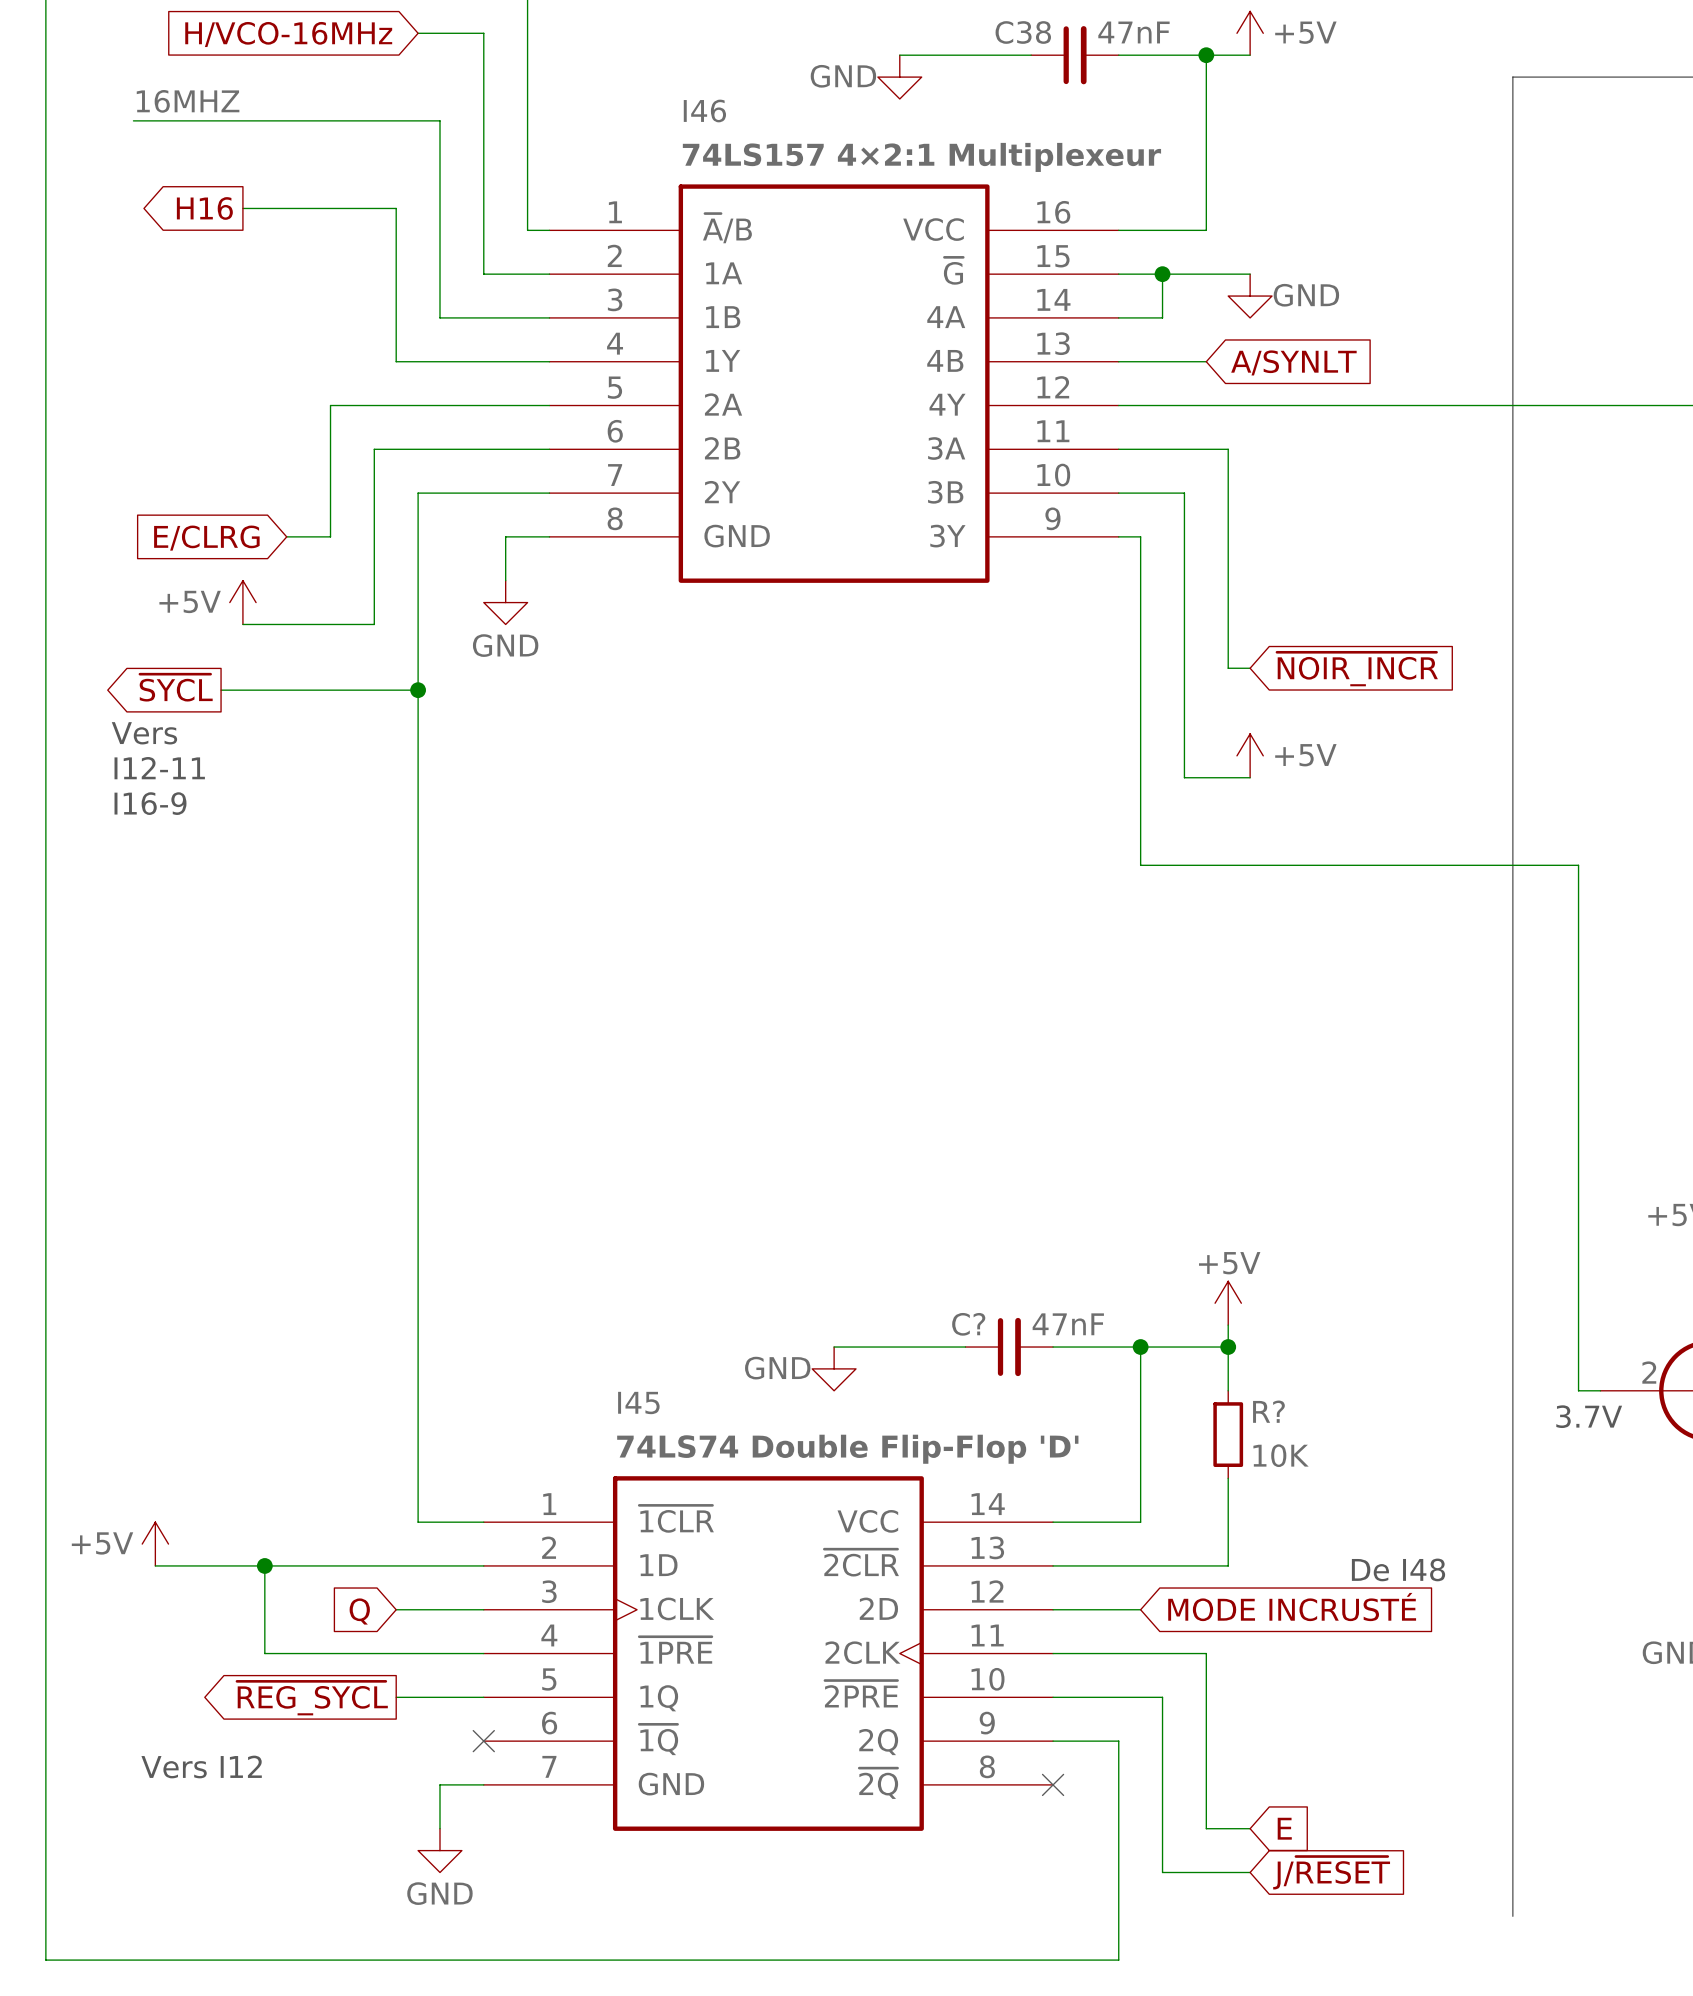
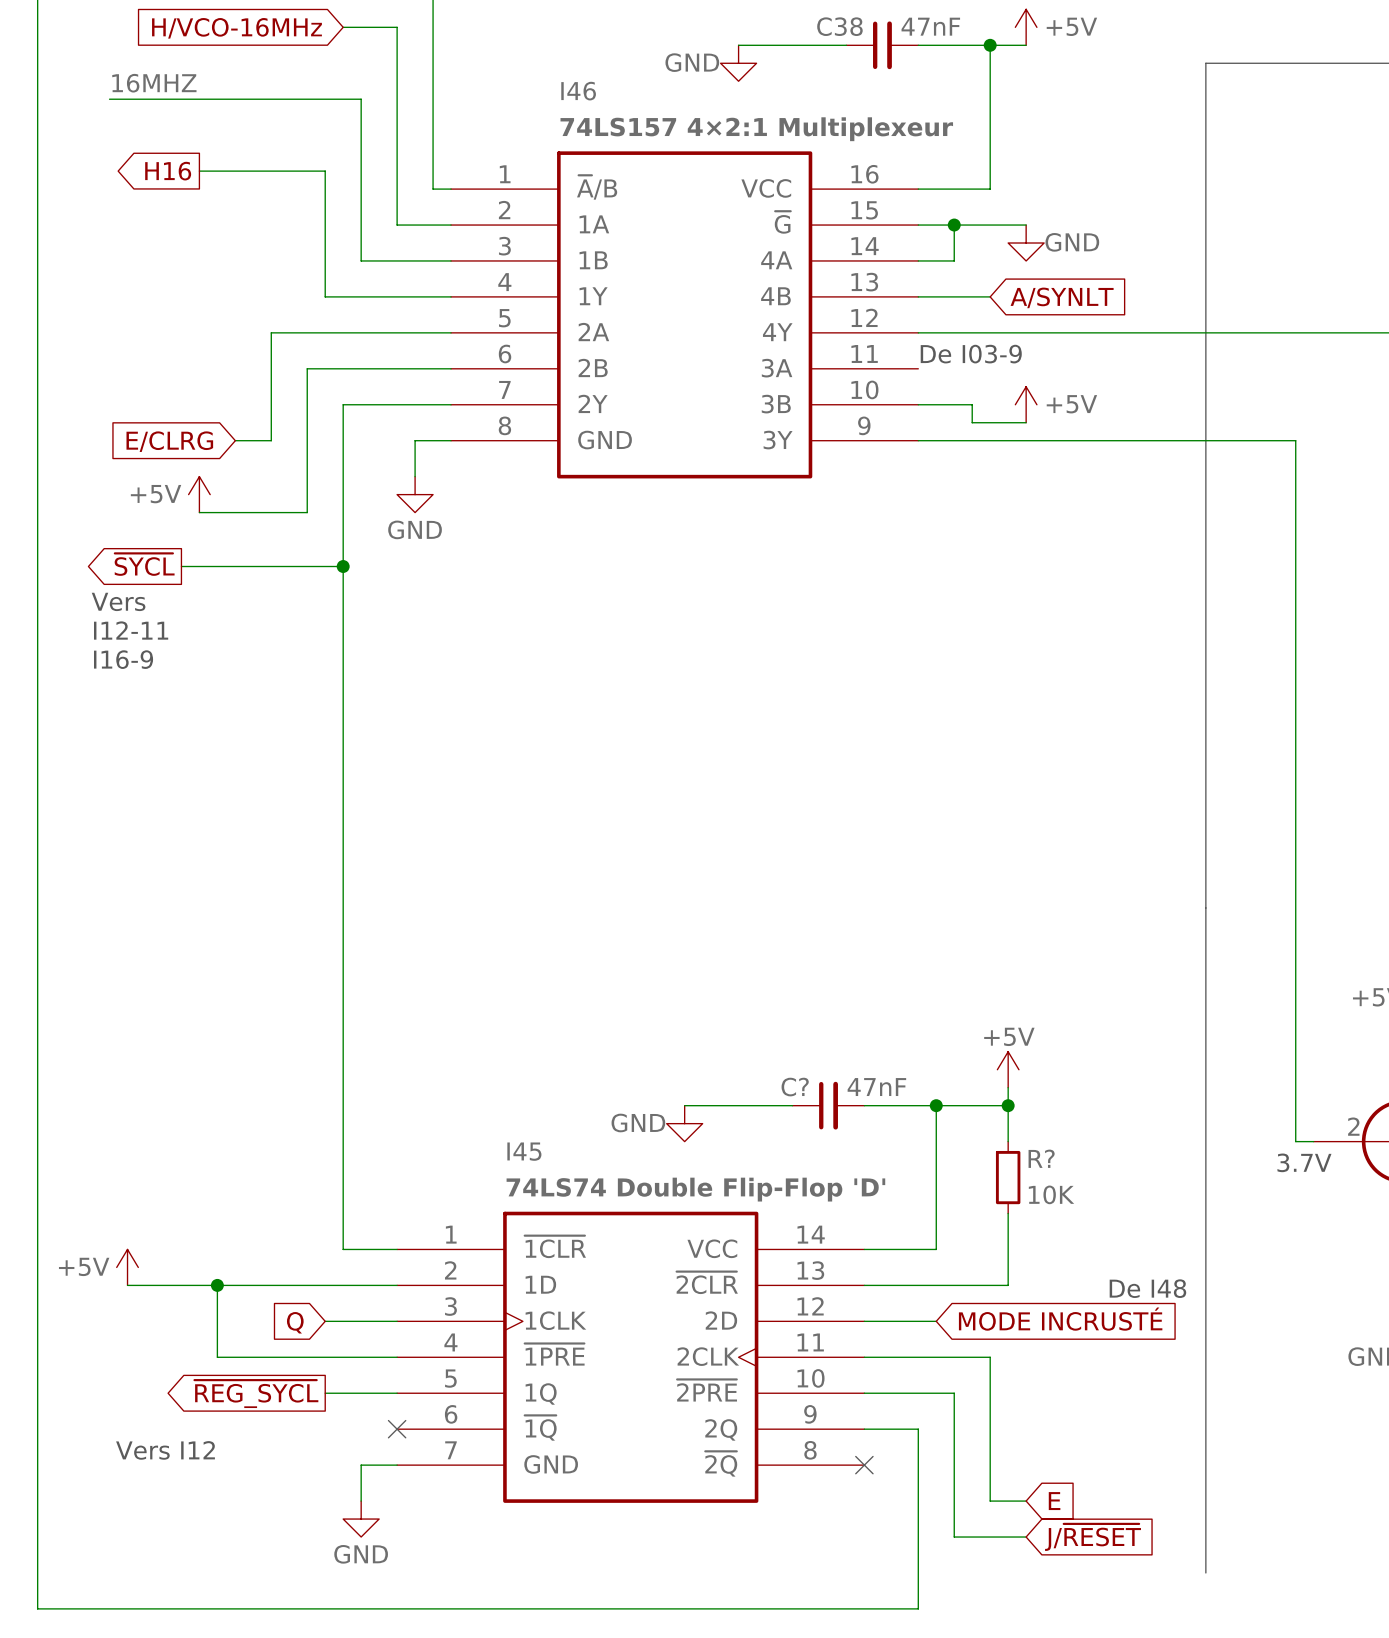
line: (1512, 77) (1512, 1916) -> (1241, 63) (1205, 63) (1205, 1572)
text: none -> De I03-9 (971, 354)
wire: (1118, 449) (1228, 449) (1228, 668) (1250, 668) -> none
wire: (1184, 514) (1184, 777) (1250, 777) -> (972, 422) (1026, 422)
wire: (1140, 536) (1140, 865) (1578, 865) -> (936, 440) (1295, 440) (1295, 710)
global label: ~{NOIR_INCR} (1357, 669) -> none
power symbol position: +5V (1250, 755) -> +5V (1026, 404)

